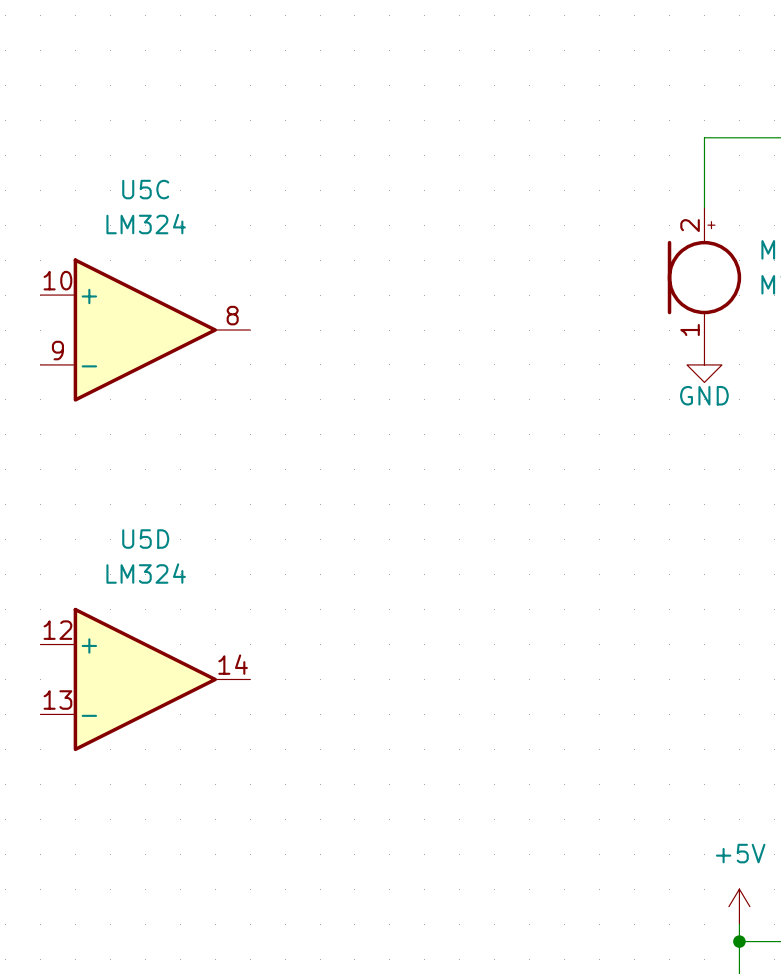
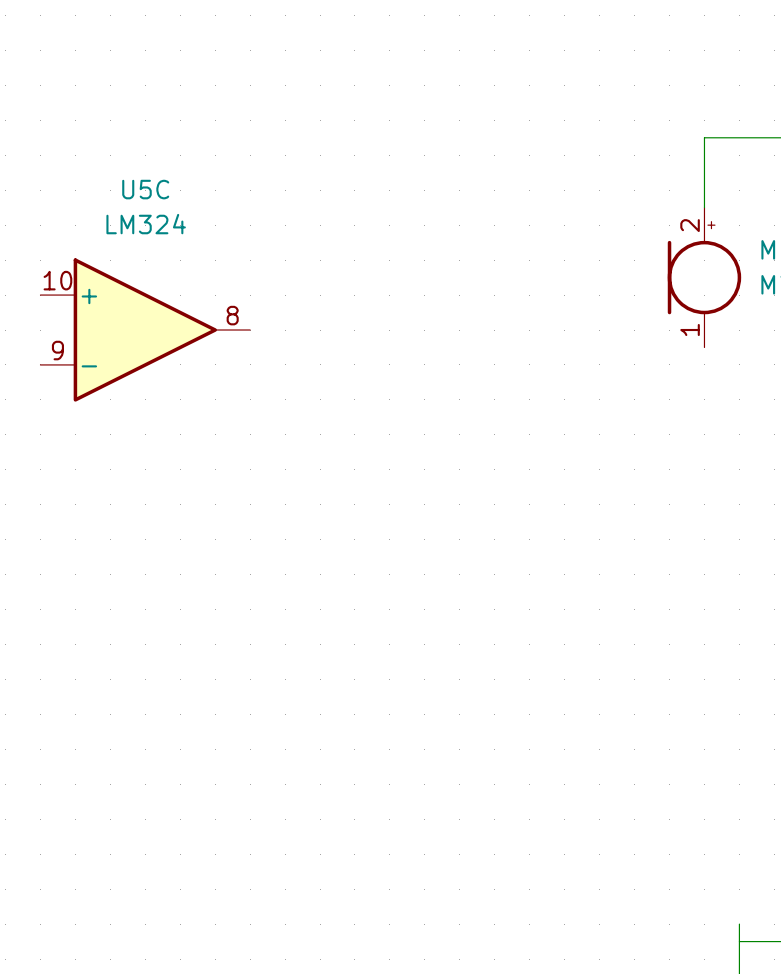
power symbol: GND (704, 364) -> none
U5D: LM324 (145, 679) -> none
power symbol: +5V (739, 906) -> none
junction: (739, 941) -> none

